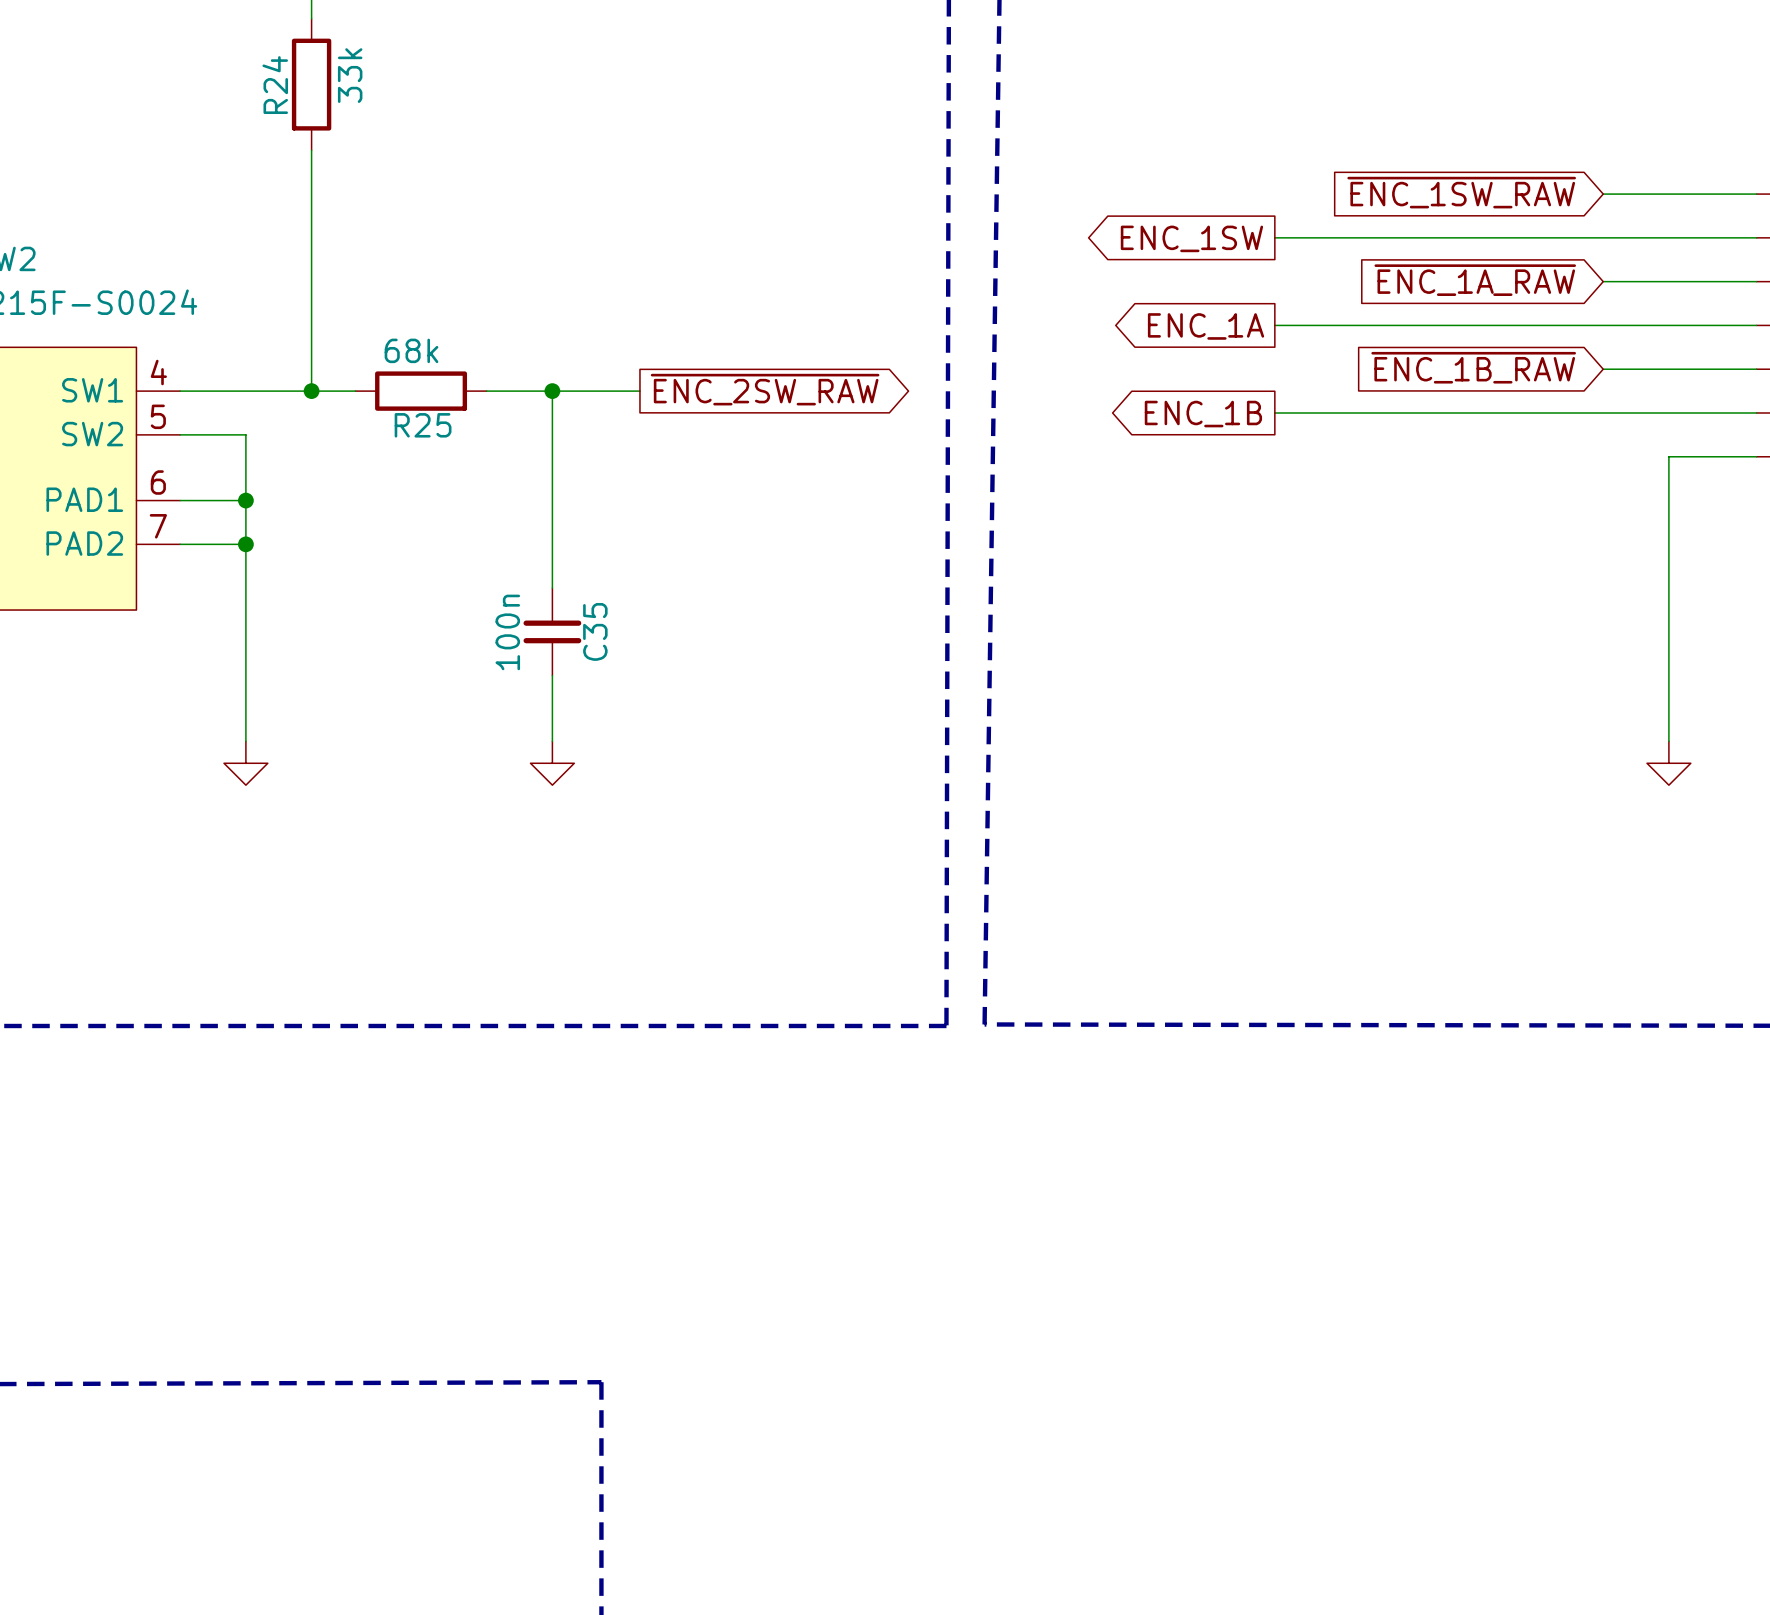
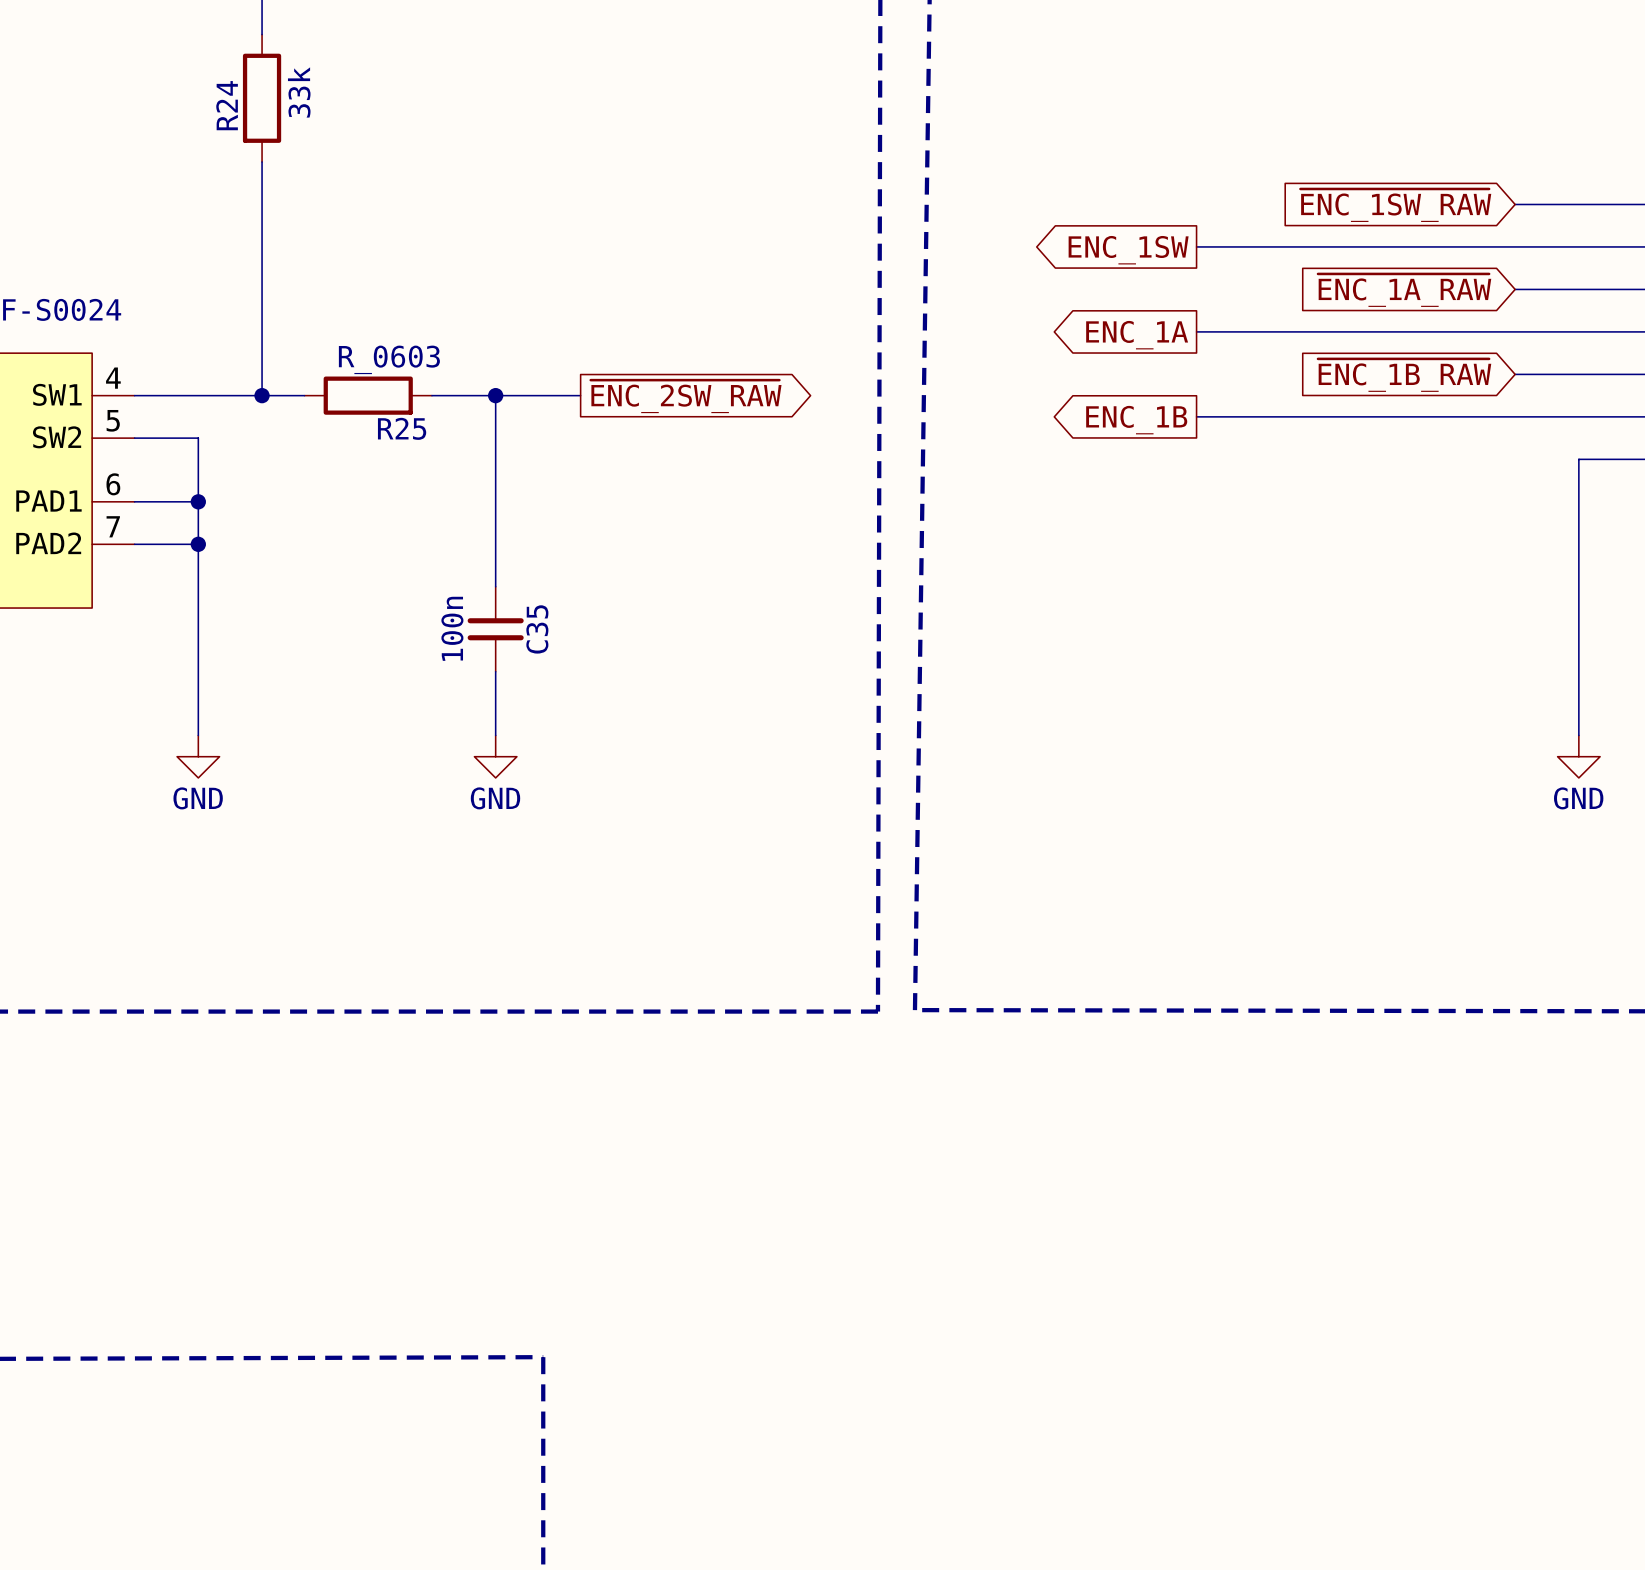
R25 value: 68k (411, 350) -> R_0603 (389, 359)
R25 name position: R25 (423, 425) -> R25 (402, 428)
power symbol text: none -> GND (198, 798)
power symbol text: none -> GND (495, 798)
power symbol text: none -> GND (1578, 798)

